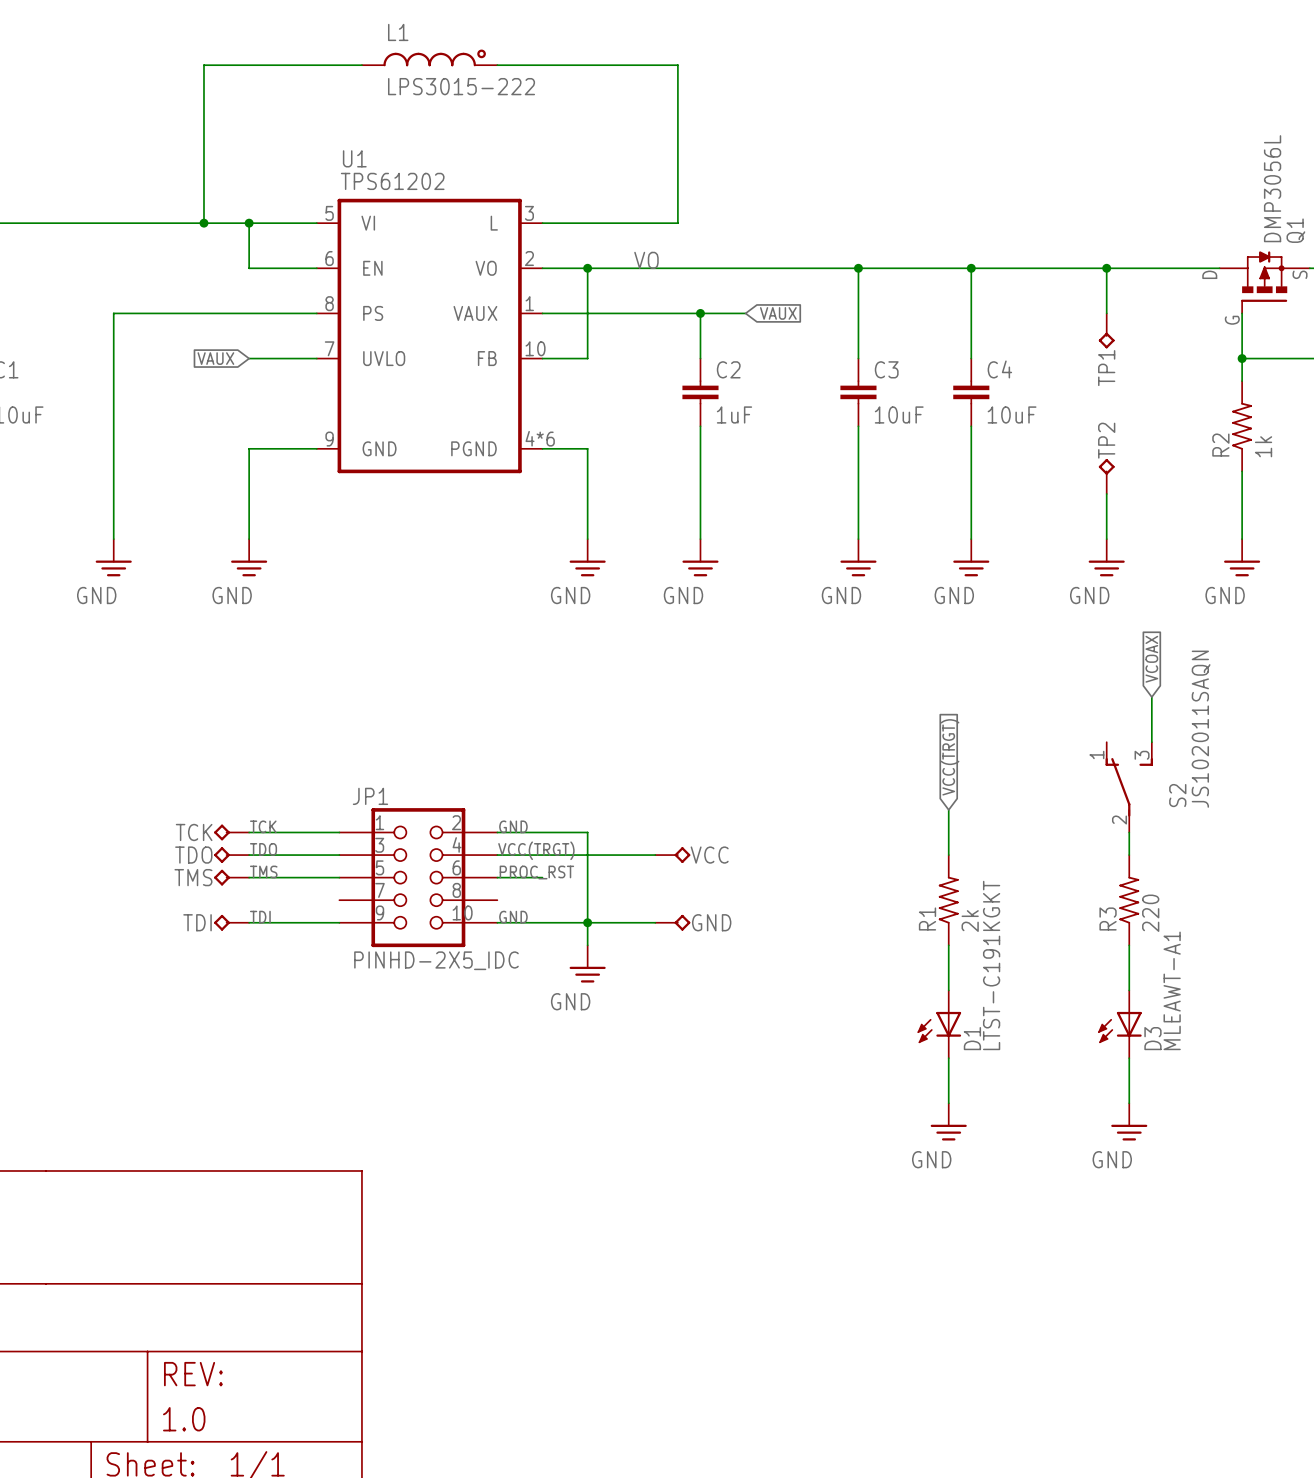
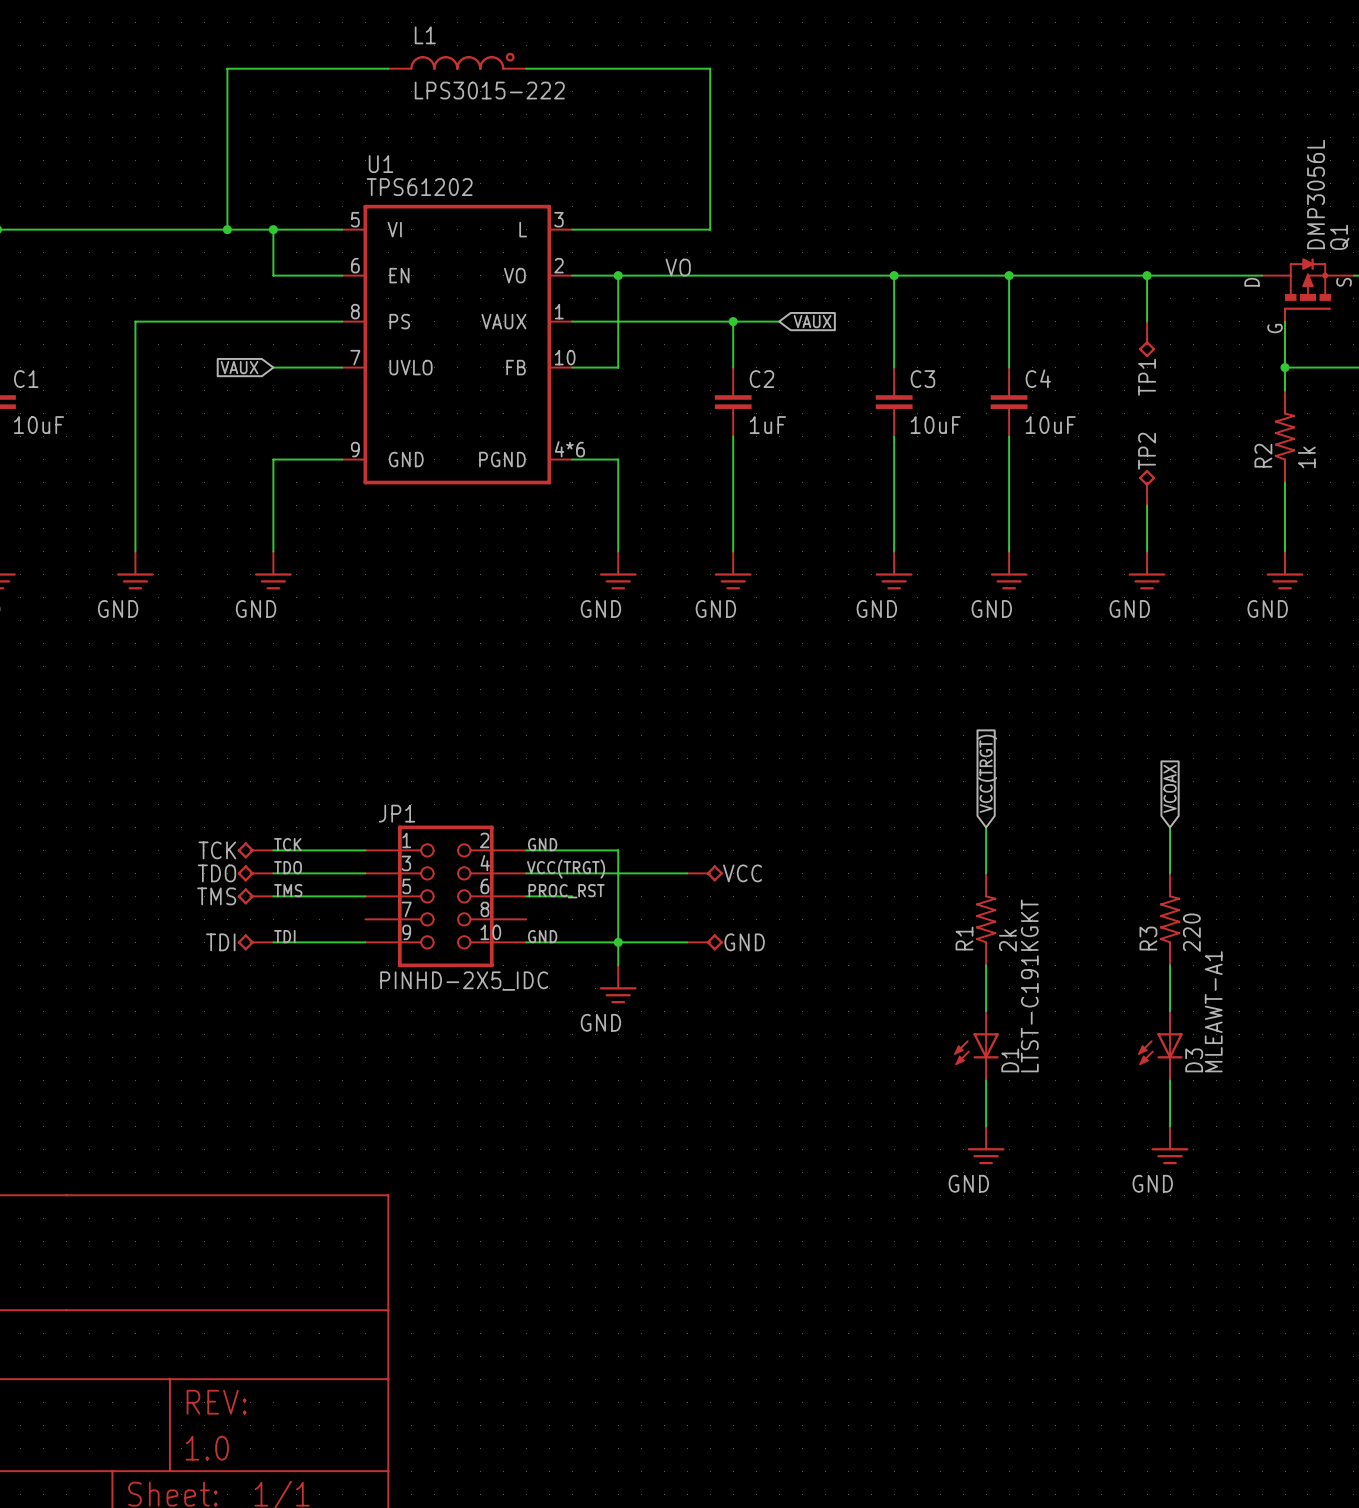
global label position: VCOAX (1151, 659) -> VCOAX (1170, 788)
wire: (1151, 697) (1151, 742) -> none
S2: JS102011SAQN (1129, 787) -> none

